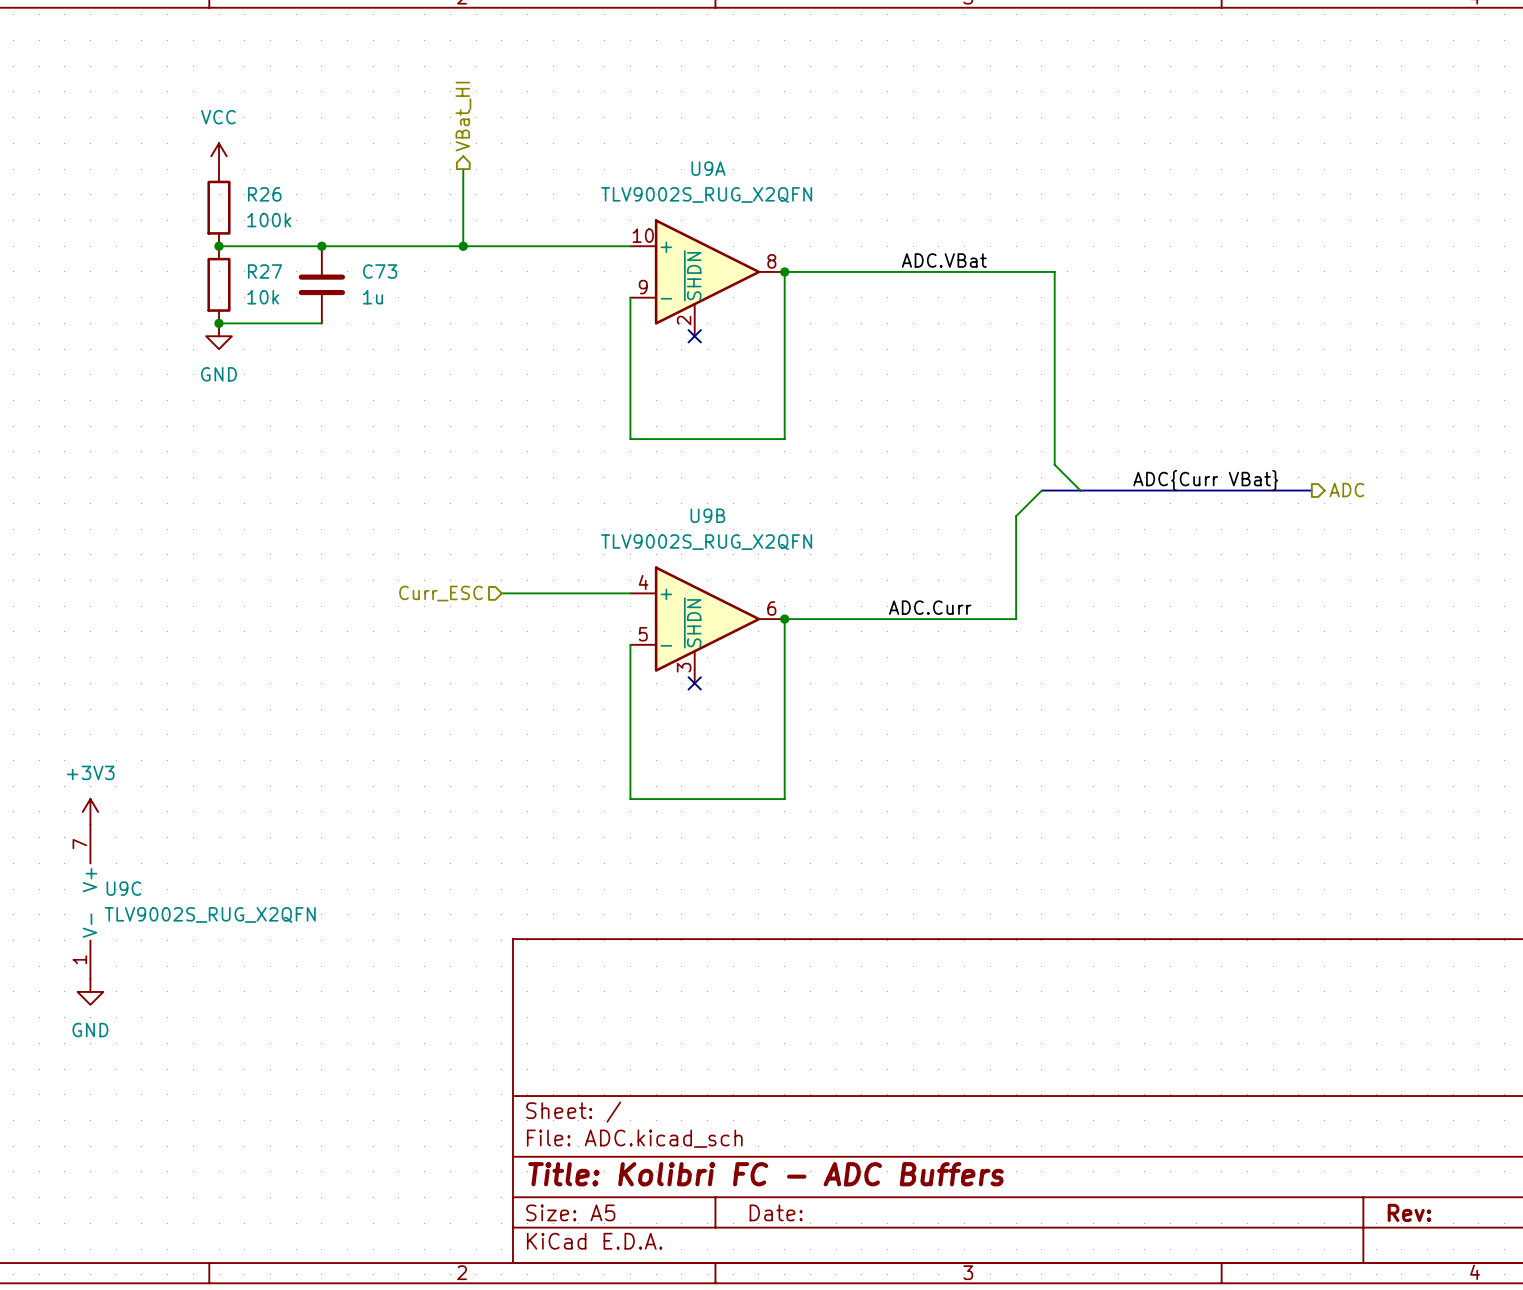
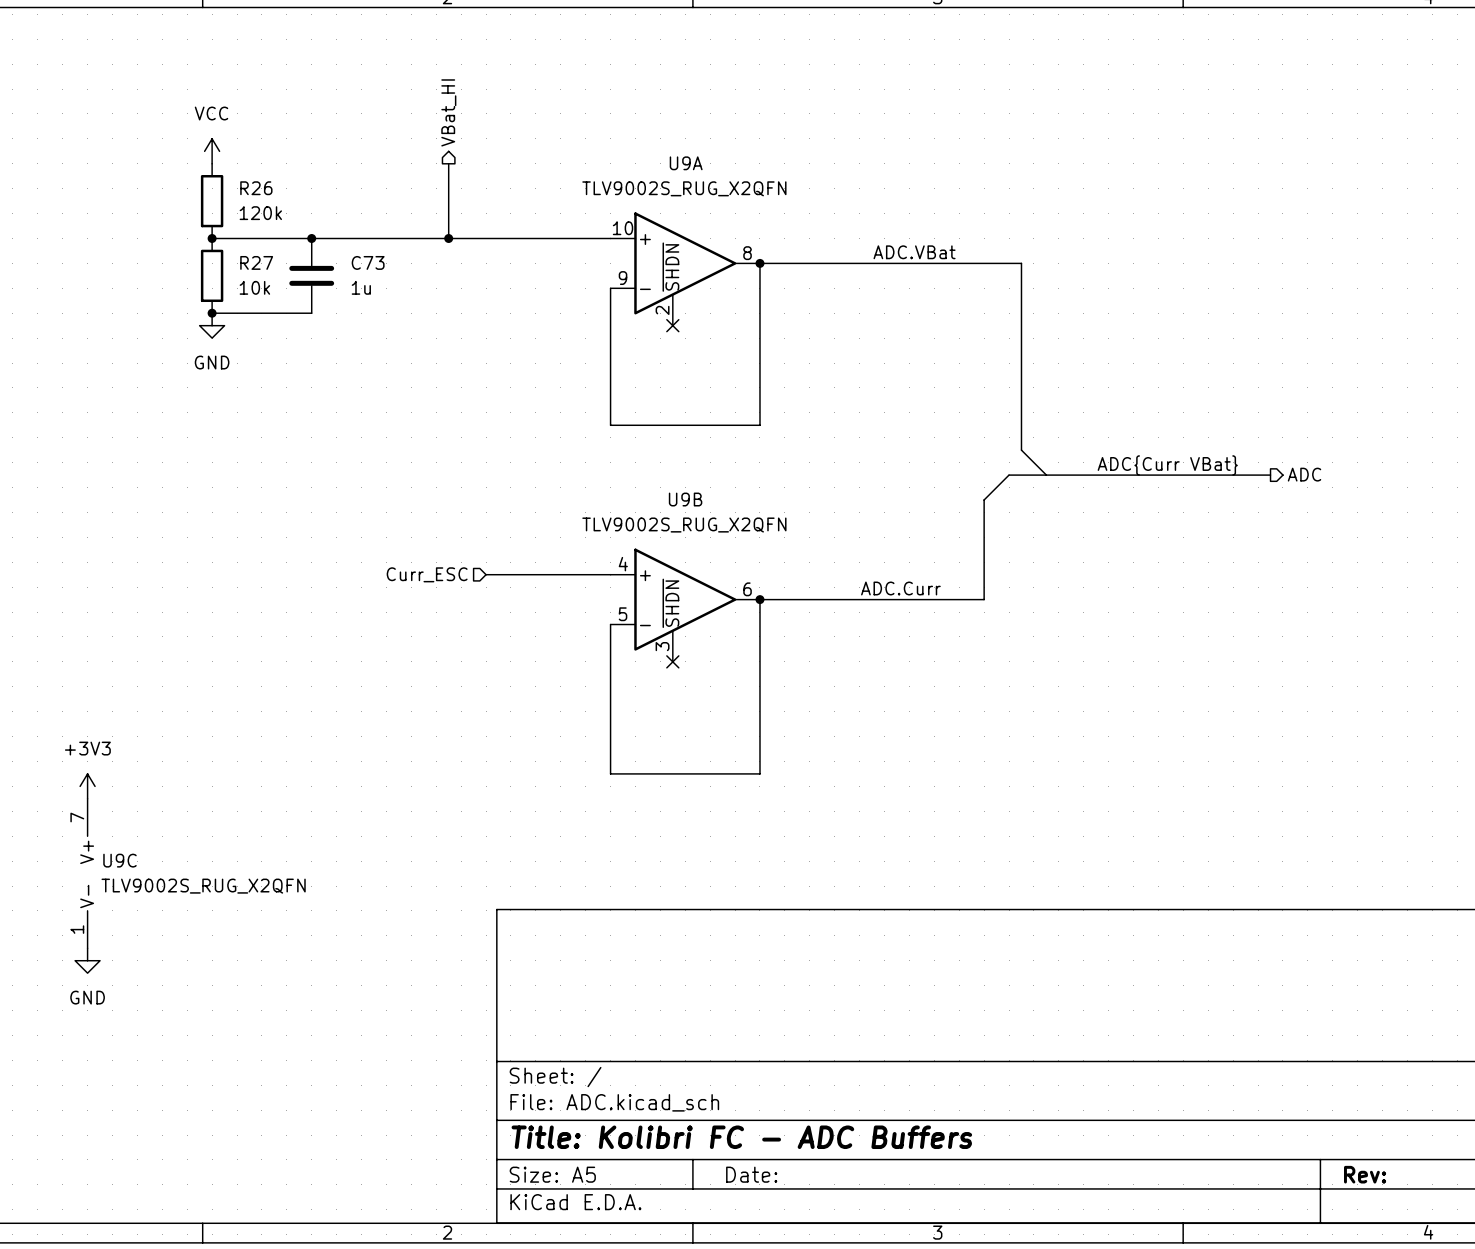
R26 value: 100k (269, 220) -> 120k (260, 213)

